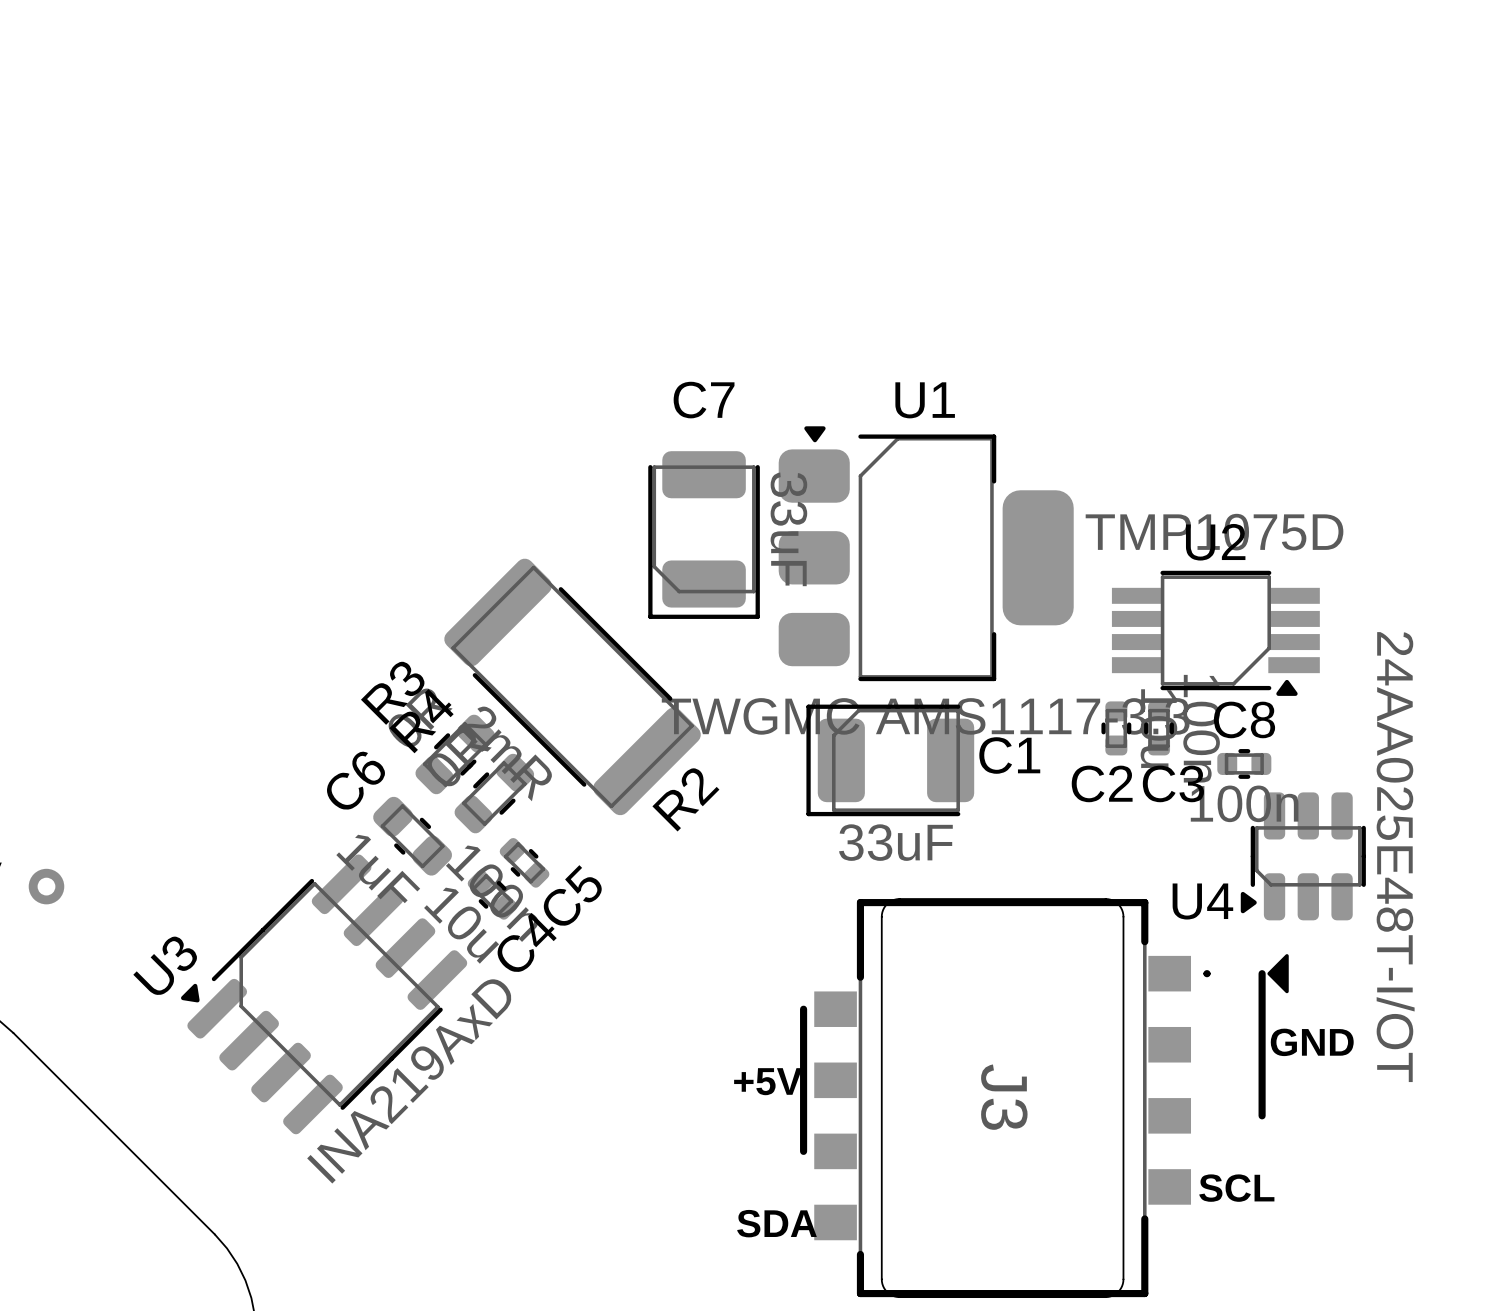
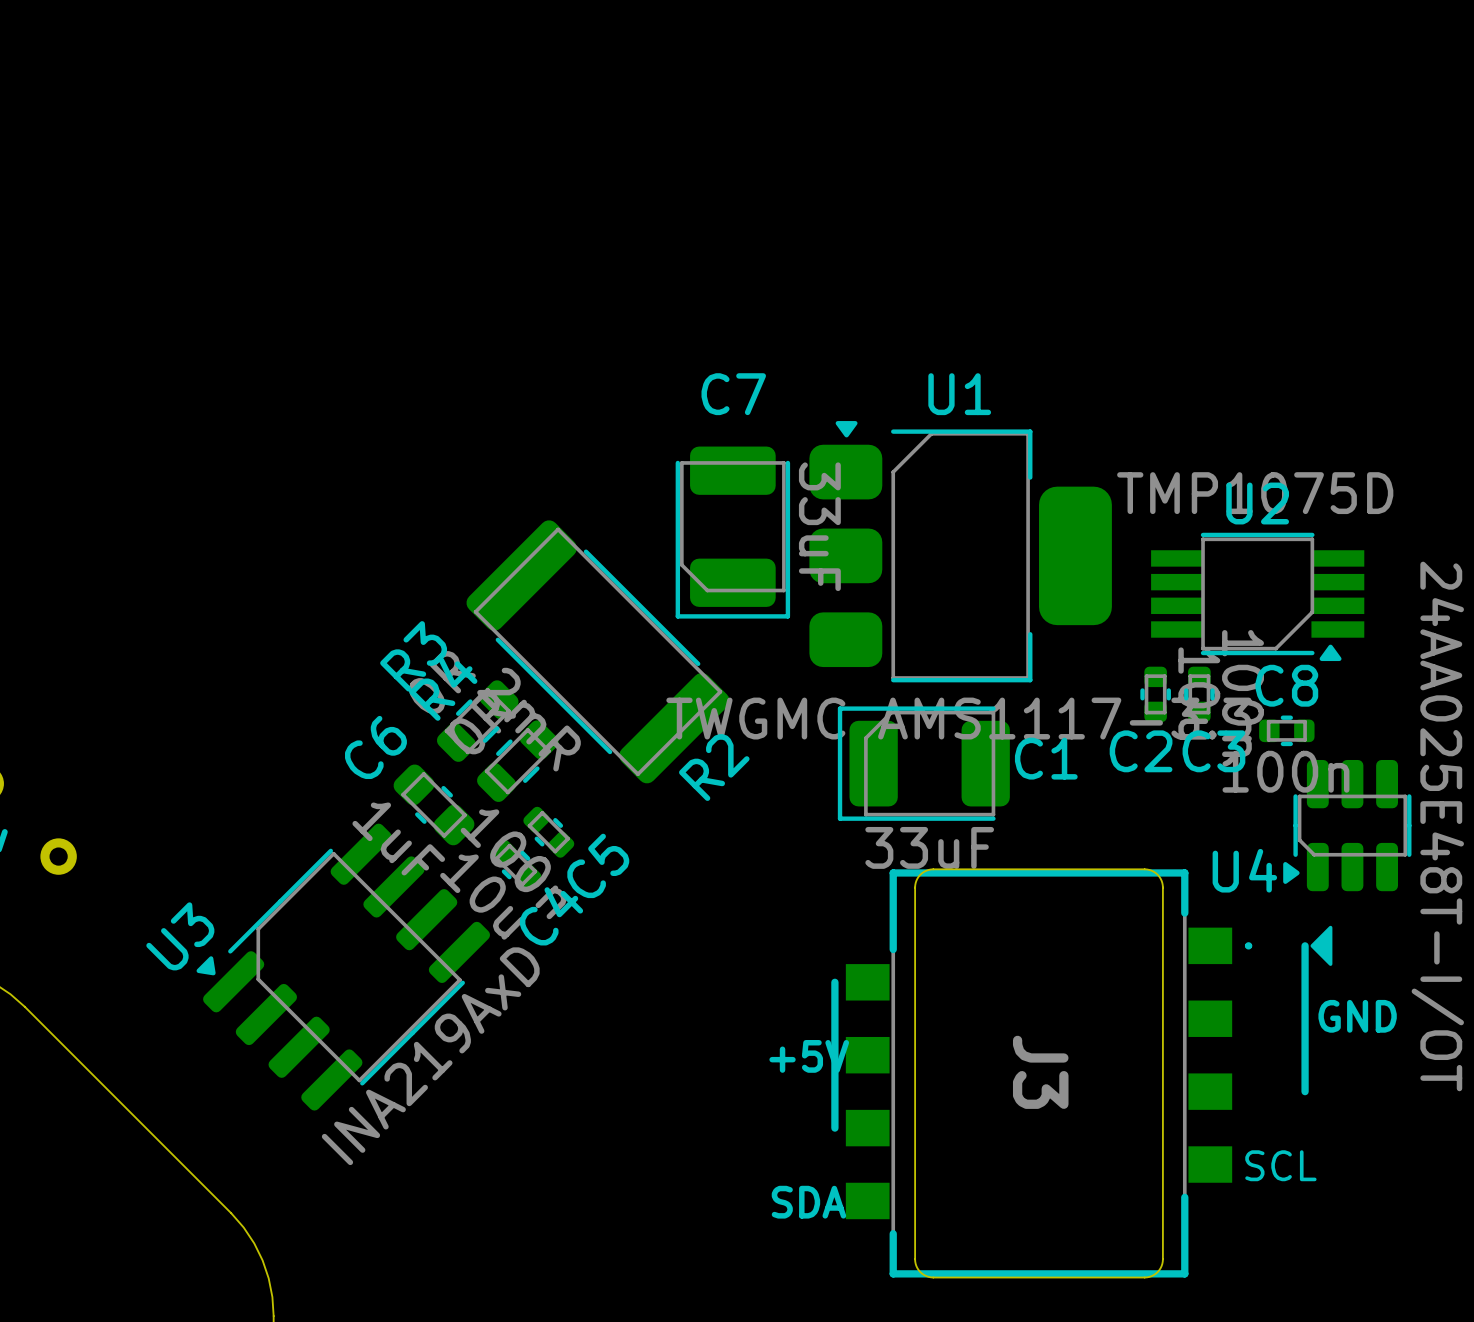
C7 position: (704, 535) -> (732, 532)
U1 position: (926, 553) -> (960, 551)
C1 position: (890, 760) -> (923, 763)

